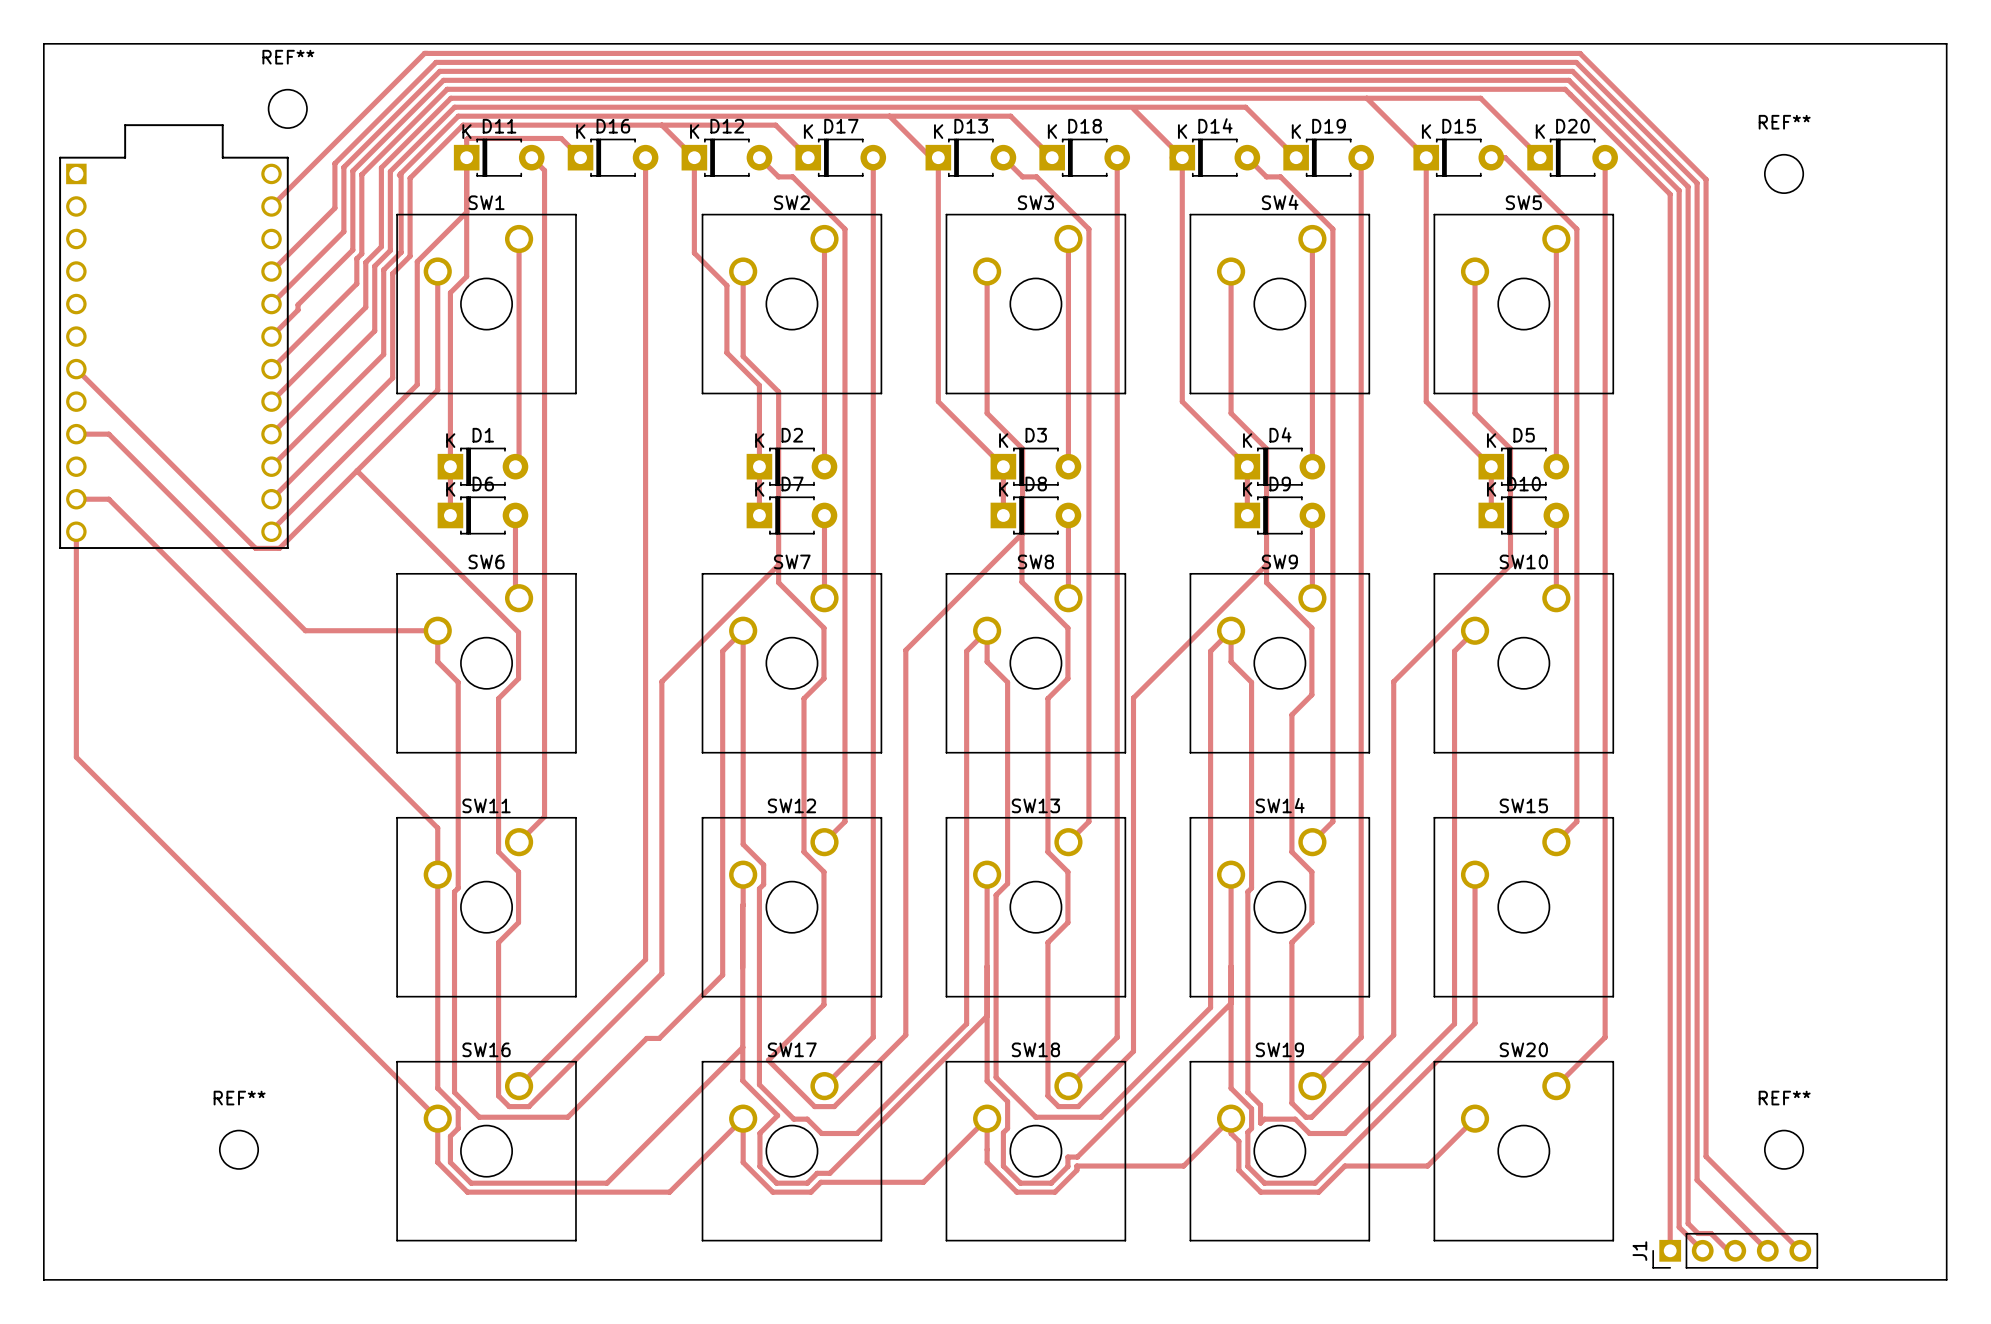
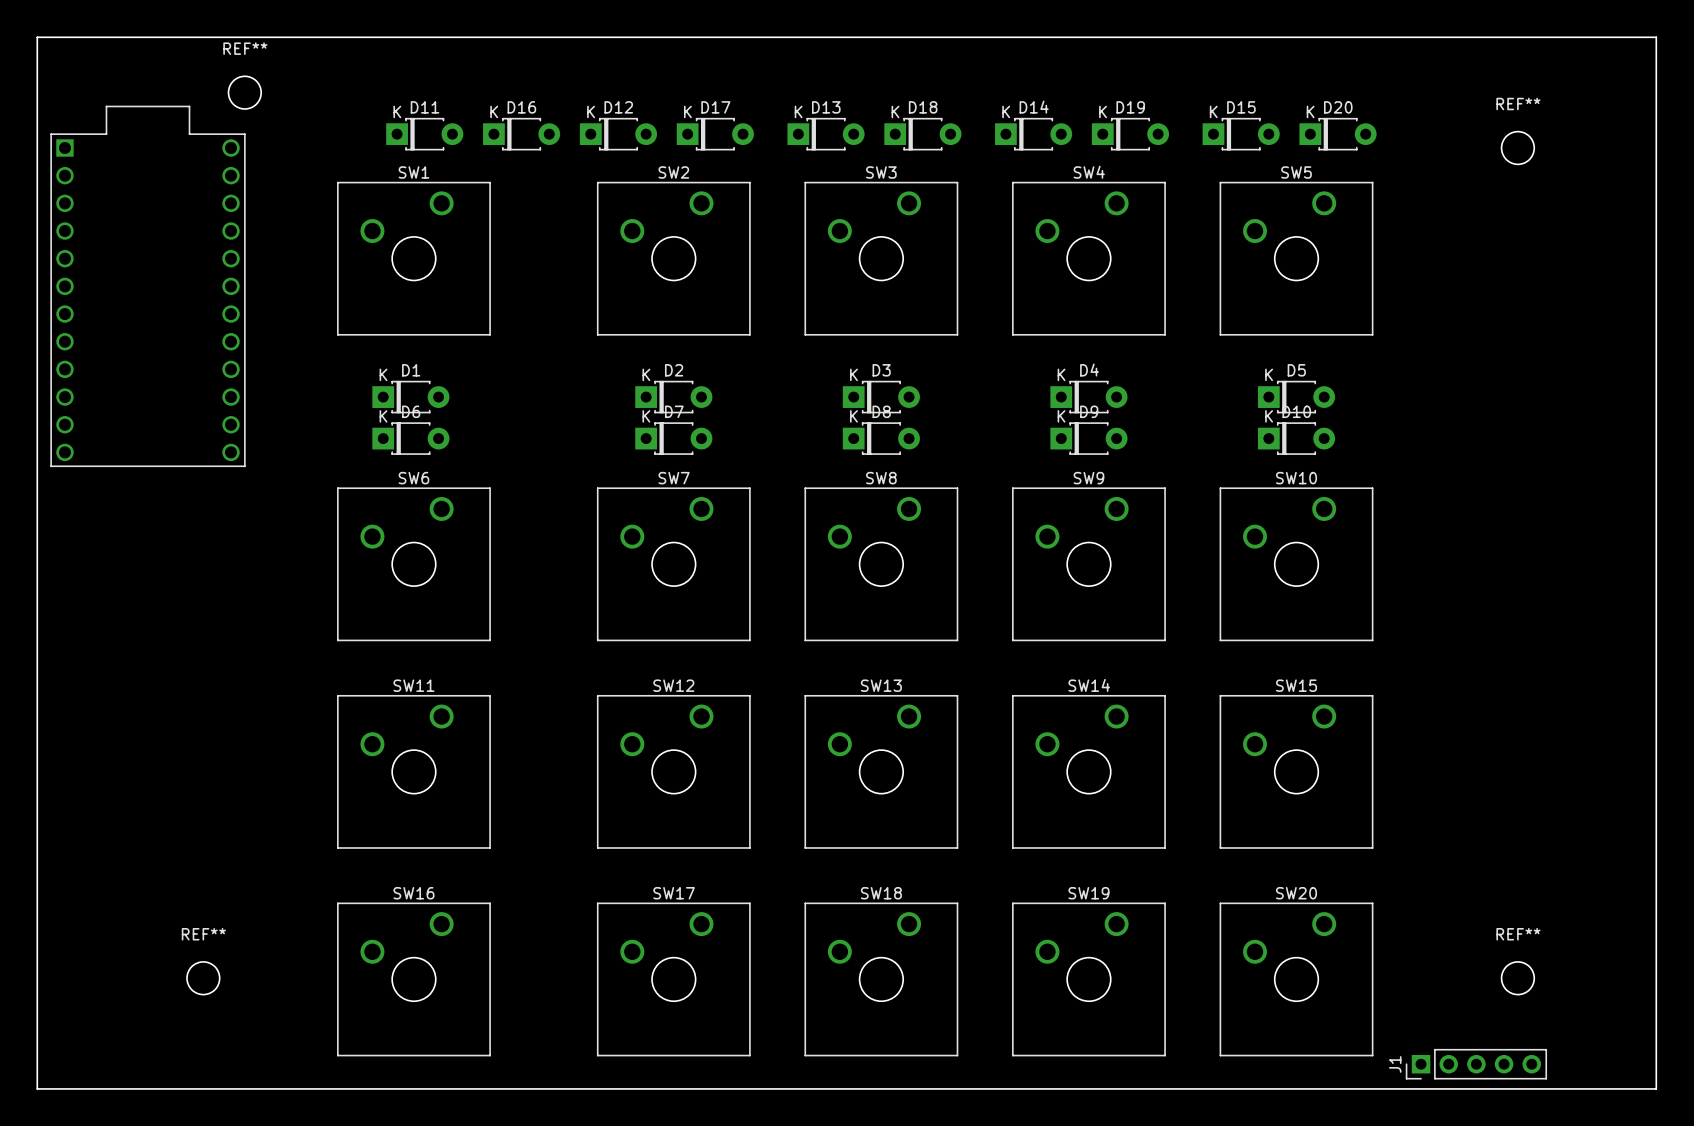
track: (1366, 98) (1426, 157) (1426, 401) (1491, 466) (1491, 515) -> none
track: (1133, 108) (1182, 157) -> none
track: (889, 116) (931, 157) (938, 157) (938, 401) (1003, 466) (1003, 515) -> none
track: (661, 125) (694, 157) (694, 253) (726, 285) (726, 352) (759, 385) (759, 515) -> none
track: (531, 157) (544, 170) (544, 816) (519, 842) -> none
track: (580, 157) (561, 138) (466, 139) (466, 276) (450, 292) (450, 515) -> none
track: (645, 157) (645, 959) (519, 1086) -> none
track: (759, 157) (778, 176) (792, 176) (844, 229) (844, 821) (824, 842) -> none
track: (808, 157) (775, 125) (463, 125) (410, 178) (410, 256) (392, 273) (392, 378) (271, 499) -> none
track: (873, 157) (873, 1037) (824, 1086) -> none
track: (1003, 157) (1022, 176) (1036, 176) (1088, 229) (1088, 821) (1068, 842) -> none
track: (1052, 157) (1010, 116) (458, 116) (399, 175) -> none
track: (1117, 157) (1117, 1037) (1068, 1086) -> none
track: (1182, 157) (1182, 401) (1247, 466) (1247, 515) -> none
track: (1247, 157) (1266, 176) (1280, 176) (1332, 229) (1332, 821) (1312, 842) -> none
track: (1296, 157) (1245, 107) (454, 107) (390, 171) (390, 250) (374, 266) (374, 330) (271, 434) -> none
track: (1361, 157) (1361, 1037) (1312, 1086) -> none
track: (1491, 157) (1505, 157) (1576, 229) (1576, 821) (1556, 842) -> none
track: (1540, 157) (1480, 98) (450, 98) (381, 167) (381, 246) (365, 262) (365, 307) (271, 401) -> none
track: (1605, 157) (1605, 1037) (1556, 1086) -> none
track: (401, 173) (401, 252) (383, 269) (383, 354) (271, 466) -> none
track: (271, 206) (424, 53) (1580, 53) (1706, 179) (1706, 1156) (1800, 1250) -> none
track: (466, 212) (417, 261) (417, 384) (271, 531) -> none
track: (519, 238) (519, 463) (515, 466) -> none
track: (824, 238) (824, 466) -> none
track: (1068, 238) (1068, 466) -> none
track: (1312, 238) (1312, 466) -> none
track: (1556, 238) (1556, 466) -> none
track: (271, 271) (334, 208) (334, 163) (436, 62) (1576, 62) (1697, 183) (1697, 1180) (1767, 1250) -> none
track: (437, 271) (437, 390) (279, 548) (255, 548) (76, 369) -> none
track: (743, 271) (743, 356) (778, 391) (778, 582) (823, 628) (823, 678) (804, 698) (804, 851) (823, 871) (823, 1004) (768, 1060) (814, 1106) (834, 1106) (905, 1035) (905, 650) (1022, 533) (1022, 448) (987, 413) (987, 271) -> none
track: (1231, 271) (1231, 413) (1266, 448) (1266, 582) (1311, 628) (1311, 694) (1291, 714) (1291, 851) (1311, 871) (1311, 922) (1291, 942) (1291, 1103) (1305, 1117) (1311, 1117) (1393, 1035) (1393, 681) (1510, 564) (1510, 448) (1475, 413) (1475, 271) -> none
track: (271, 304) (343, 231) (343, 167) (439, 71) (1572, 71) (1688, 186) (1688, 1223) (1698, 1233) (1711, 1233) (1728, 1250) (1735, 1250) -> none
track: (271, 336) (298, 310) (298, 304) (352, 250) (352, 171) (443, 80) (1568, 80) (1679, 190) (1679, 1227) (1702, 1250) -> none
track: (271, 369) (356, 283) (356, 258) (361, 253) (361, 174) (447, 89) (1565, 89) (1670, 194) (1670, 1250) -> none
track: (76, 434) (108, 434) (305, 630) (437, 630) (437, 661) (458, 682) (458, 888) (454, 891) (454, 1092) (479, 1117) (567, 1117) (646, 1038) (659, 1038) (722, 975) (722, 651) (743, 630) (743, 844) (763, 864) (763, 884) (759, 888) (759, 1084) (793, 1119) (807, 1119) (821, 1133) (857, 1133) (966, 1023) (966, 651) (987, 630) (987, 661) (1007, 682) (1007, 883) (996, 895) (996, 1077) (1035, 1117) (1100, 1117) (1210, 1007) (1210, 651) (1231, 630) (1231, 661) (1251, 682) (1251, 888) (1247, 891) (1247, 1092) (1260, 1105) (1260, 1123) (1264, 1119) (1295, 1119) (1309, 1133) (1344, 1133) (1454, 1023) (1454, 651) (1475, 630) -> none
track: (357, 470) (518, 632) (518, 678) (498, 698) (498, 851) (518, 871) (518, 922) (498, 942) (498, 1095) (509, 1106) (528, 1106) (661, 973) (661, 681) (778, 564) -> none
track: (76, 499) (108, 499) (437, 828) (437, 1088) (458, 1108) (458, 1128) (450, 1136) (450, 1162) (471, 1183) (606, 1183) (742, 1047) -> none
track: (515, 515) (515, 594) (519, 598) -> none
track: (824, 515) (824, 598) -> none
track: (1068, 515) (1068, 598) -> none
track: (1312, 515) (1312, 598) -> none
track: (1556, 515) (1556, 598) -> none
track: (76, 531) (76, 757) (437, 1118) (437, 1162) (467, 1192) (669, 1192) (743, 1118) (743, 1162) (772, 1192) (811, 1192) (820, 1182) (923, 1182) (987, 1118) (987, 1162) (1016, 1192) (1054, 1192) (1076, 1170) (1076, 1166) (1183, 1166) (1231, 1118) (1231, 1133) (1238, 1141) (1238, 1170) (1260, 1192) (1318, 1192) (1344, 1166) (1427, 1166) (1475, 1118) -> none
track: (1021, 534) (1021, 582) (1067, 628) (1067, 678) (1047, 698) (1047, 851) (1067, 871) (1067, 922) (1047, 942) (1047, 1095) (1058, 1106) (1078, 1106) (1133, 1051) (1133, 697) (1266, 564) -> none
track: (743, 874) (742, 1080) (777, 1115) (759, 1133) (759, 1166) (776, 1183) (807, 1183) (817, 1173) (829, 1173) (987, 1016) -> none
track: (987, 874) (987, 1081) (1007, 1101) (1007, 1128) (1003, 1132) (1003, 1166) (1020, 1183) (1051, 1183) (1067, 1166) (1067, 1157) (1077, 1157) (1231, 1003) -> none
track: (1231, 874) (1231, 1088) (1251, 1108) (1251, 1128) (1247, 1132) (1247, 1166) (1264, 1183) (1315, 1183) (1475, 1023) (1475, 874) -> none

